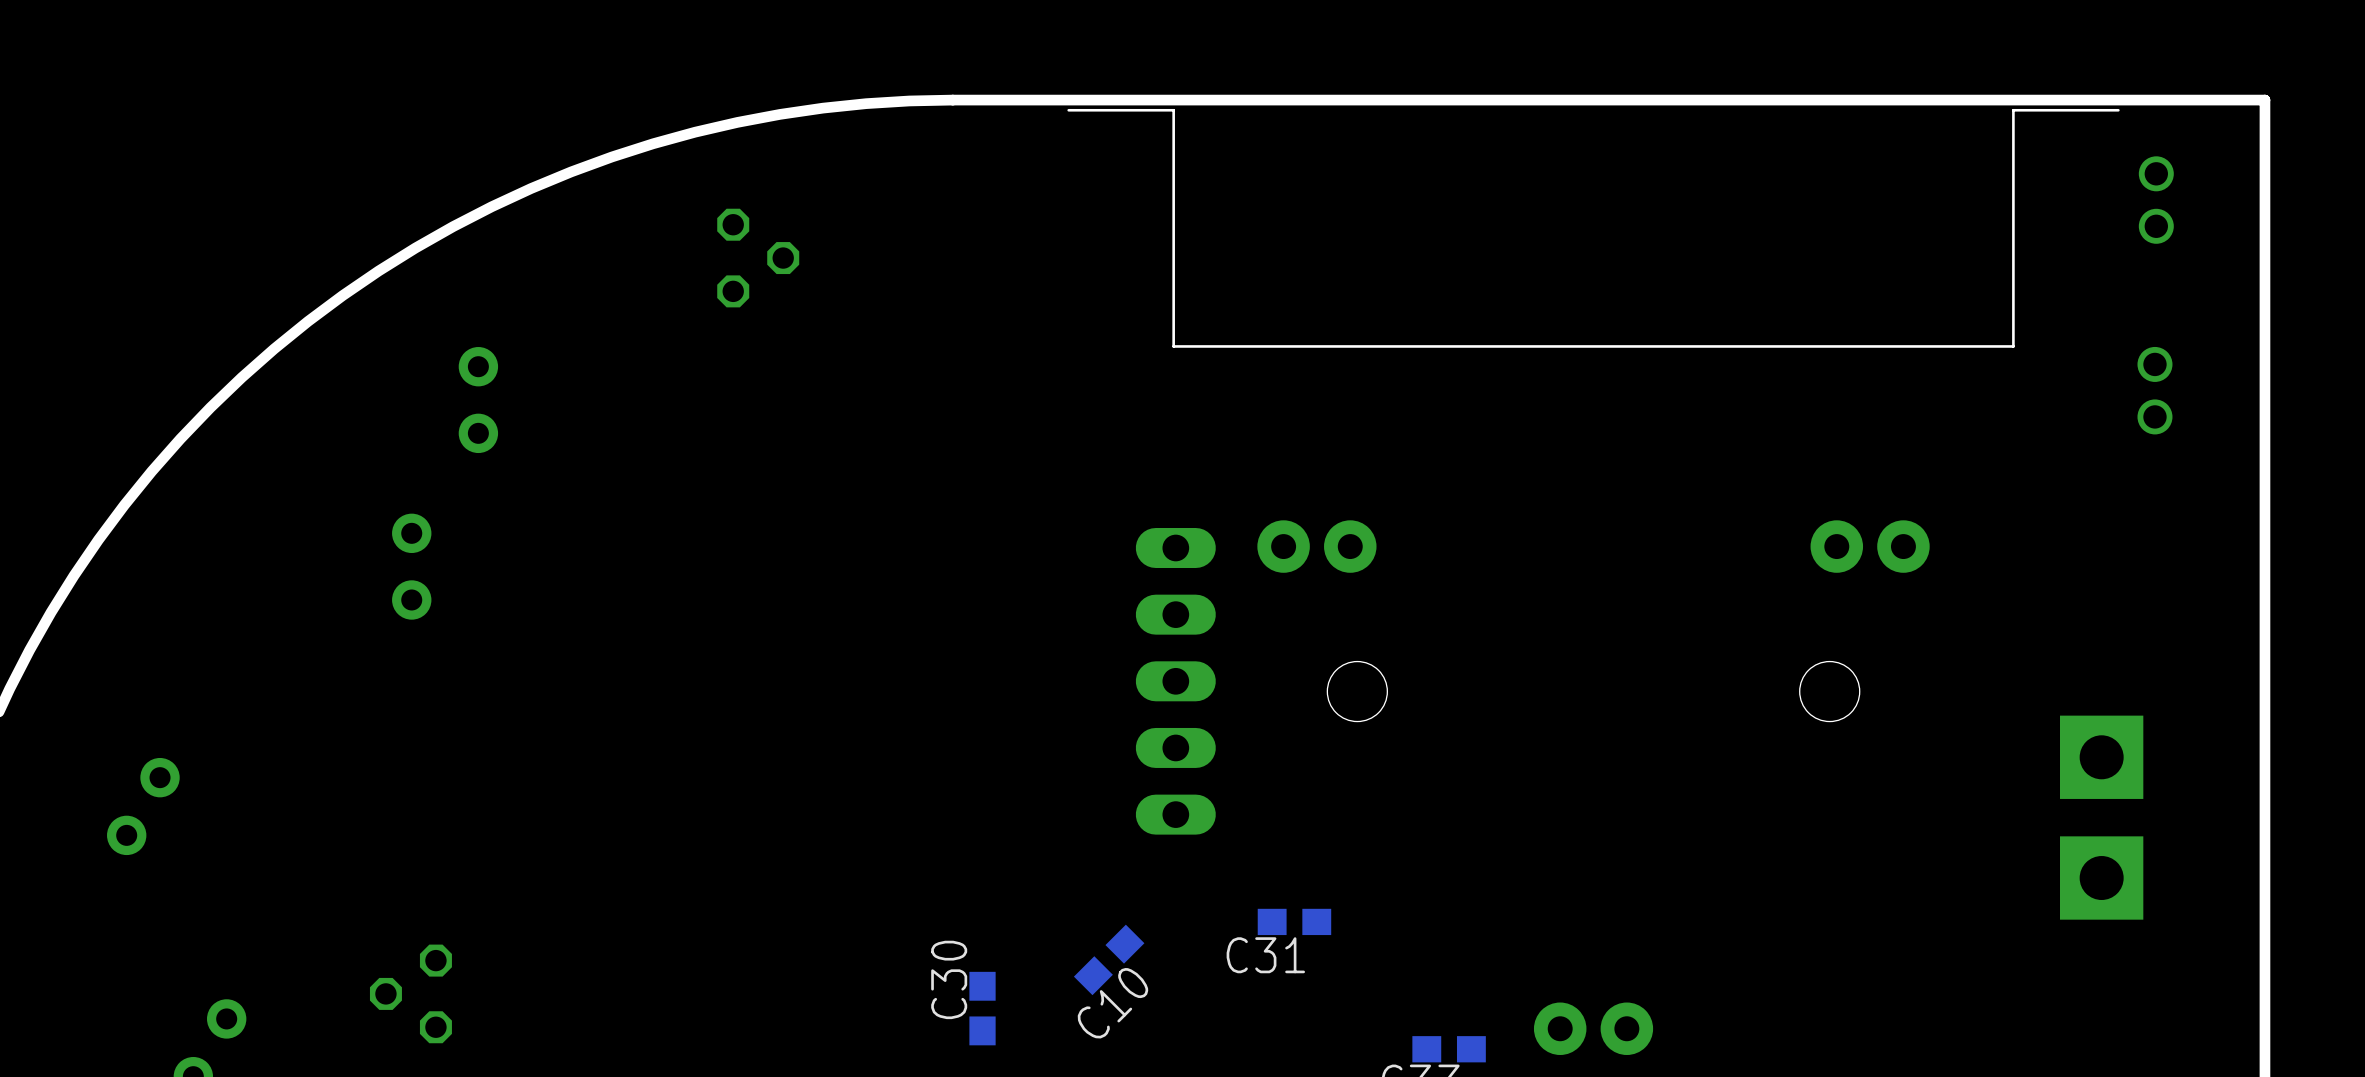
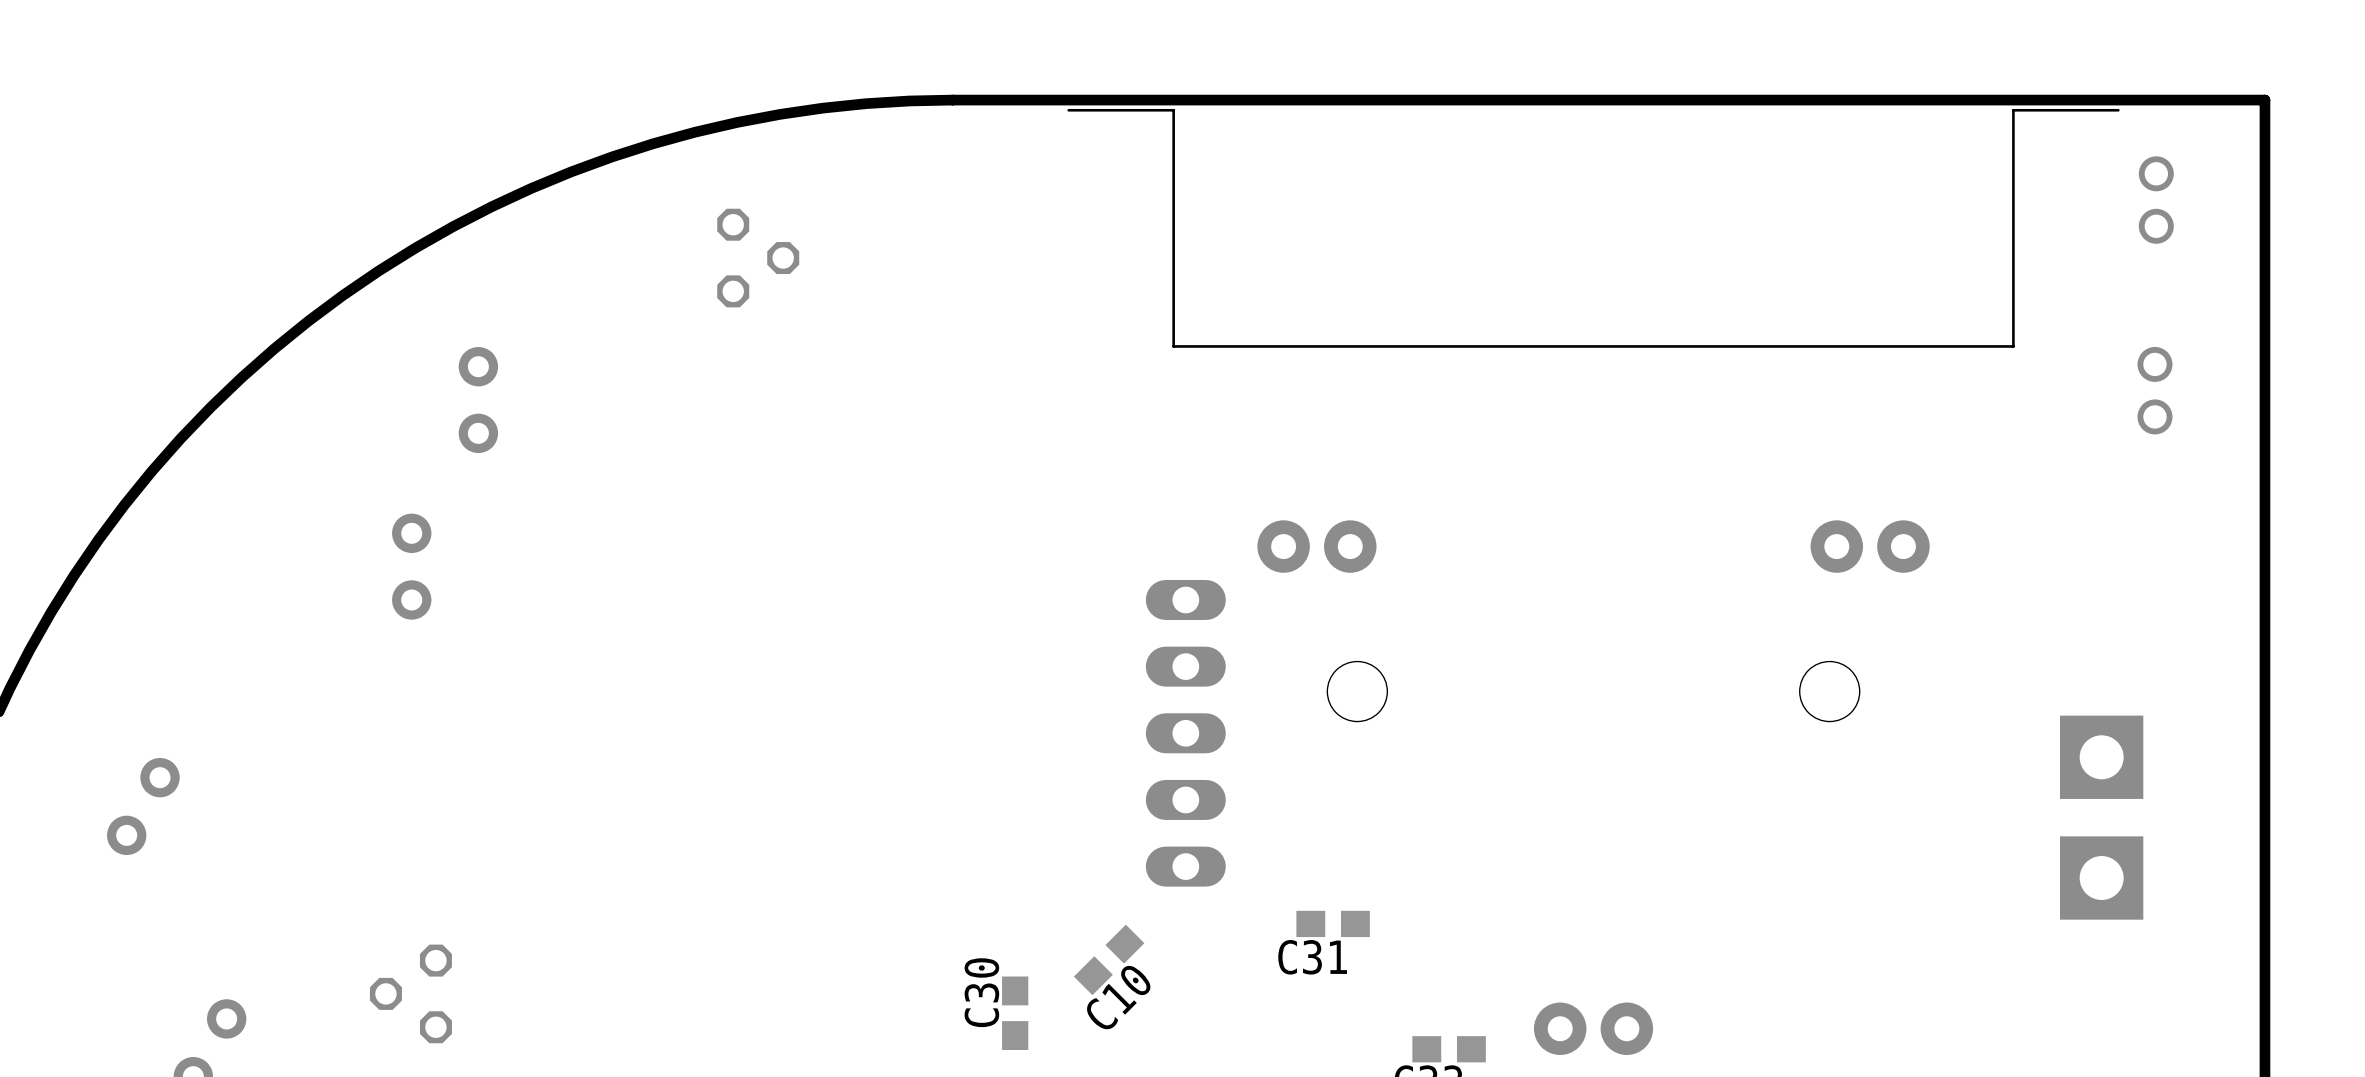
part position: (1175, 681) -> (1185, 733)
C31 position: (1294, 921) -> (1333, 923)
C30 position: (982, 1008) -> (1015, 1013)

